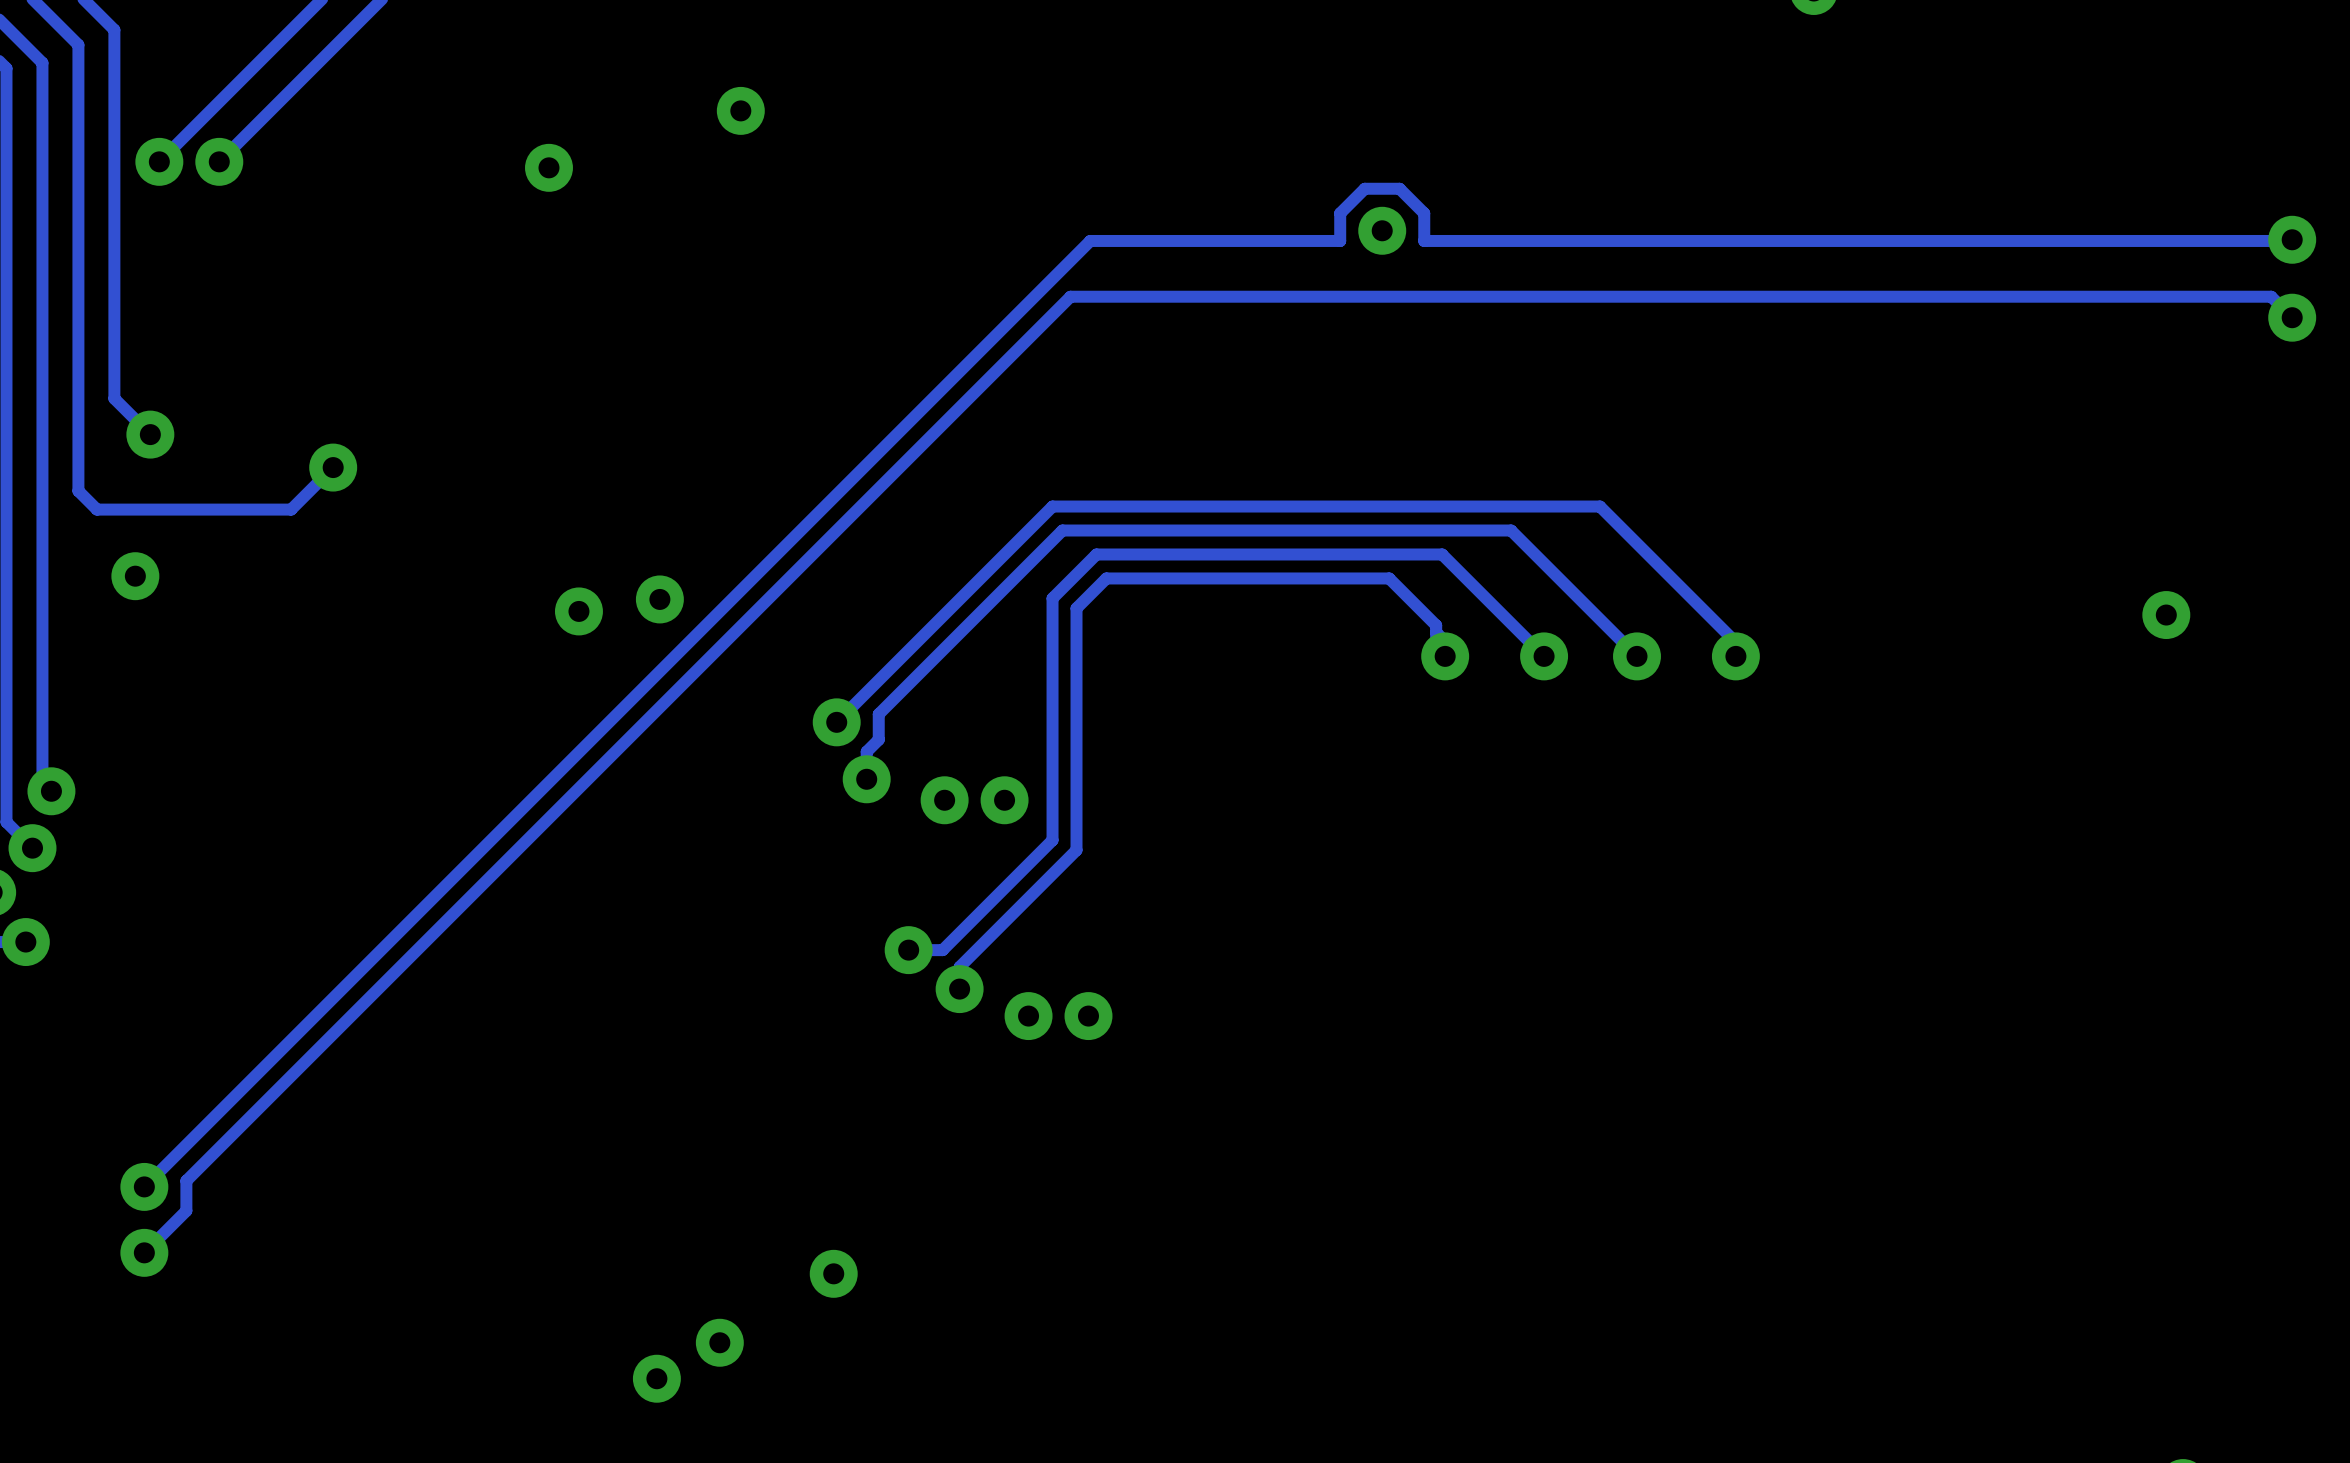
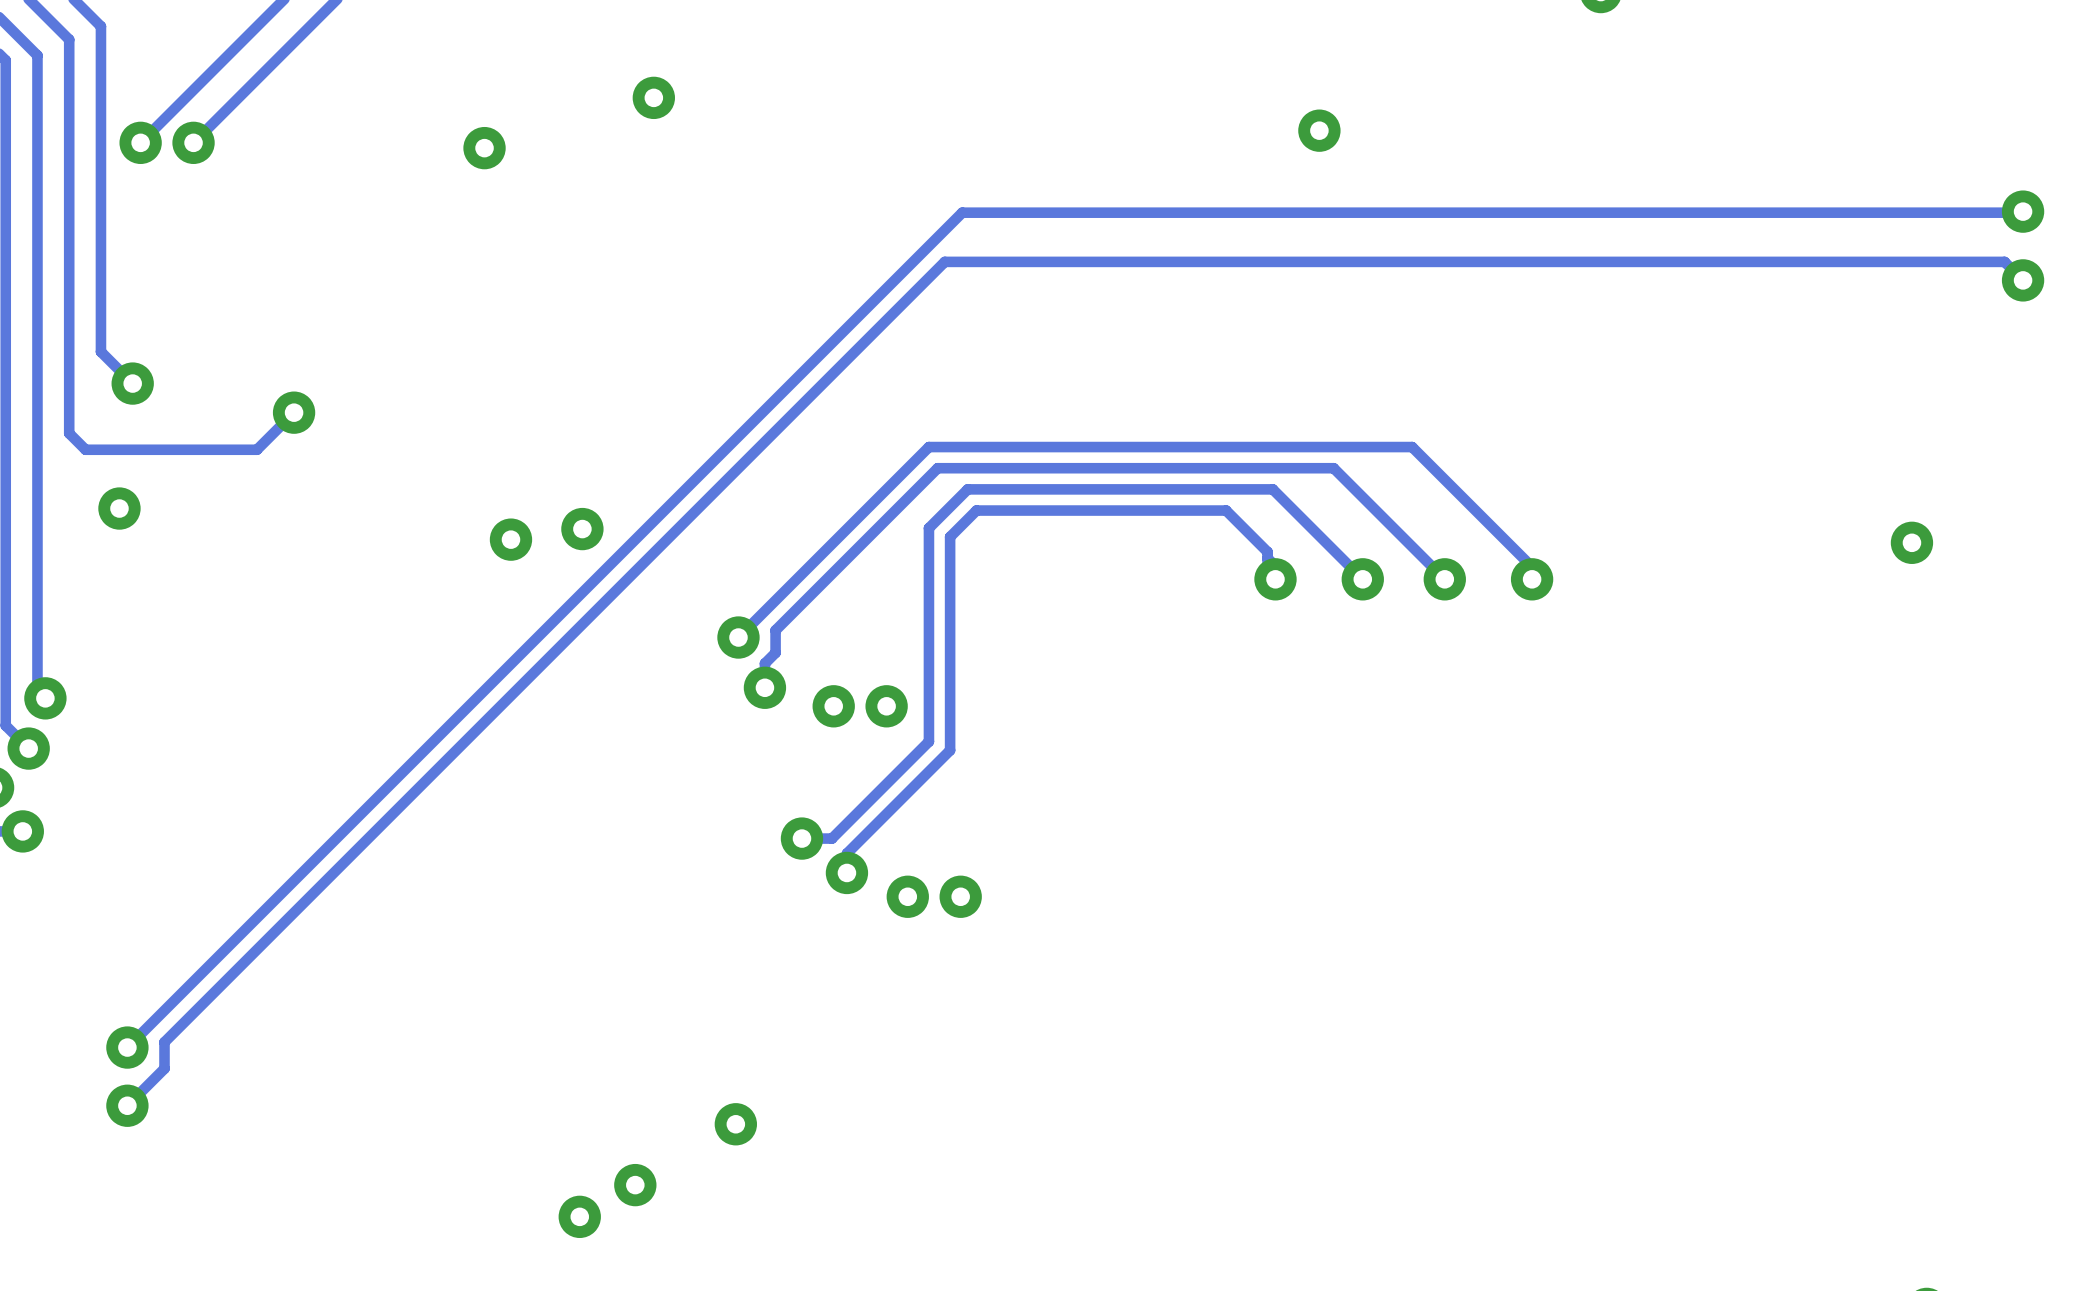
via position: (1382, 230) -> (1319, 130)
track: (1424, 240) (1424, 213) (1399, 188) (1364, 188) (1340, 213) (1340, 240) -> (1257, 212) (1182, 212)

